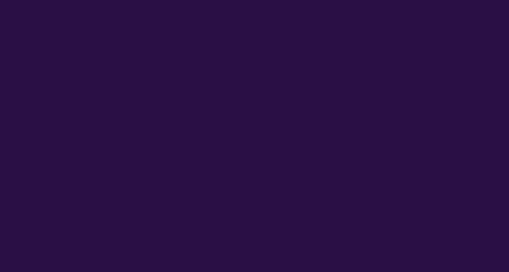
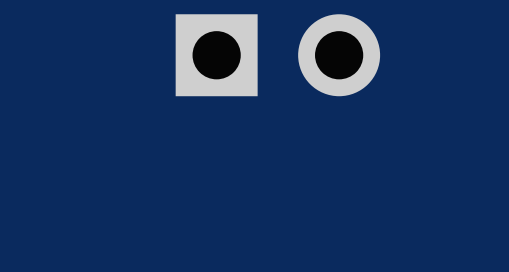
part: none -> (277, 55)

